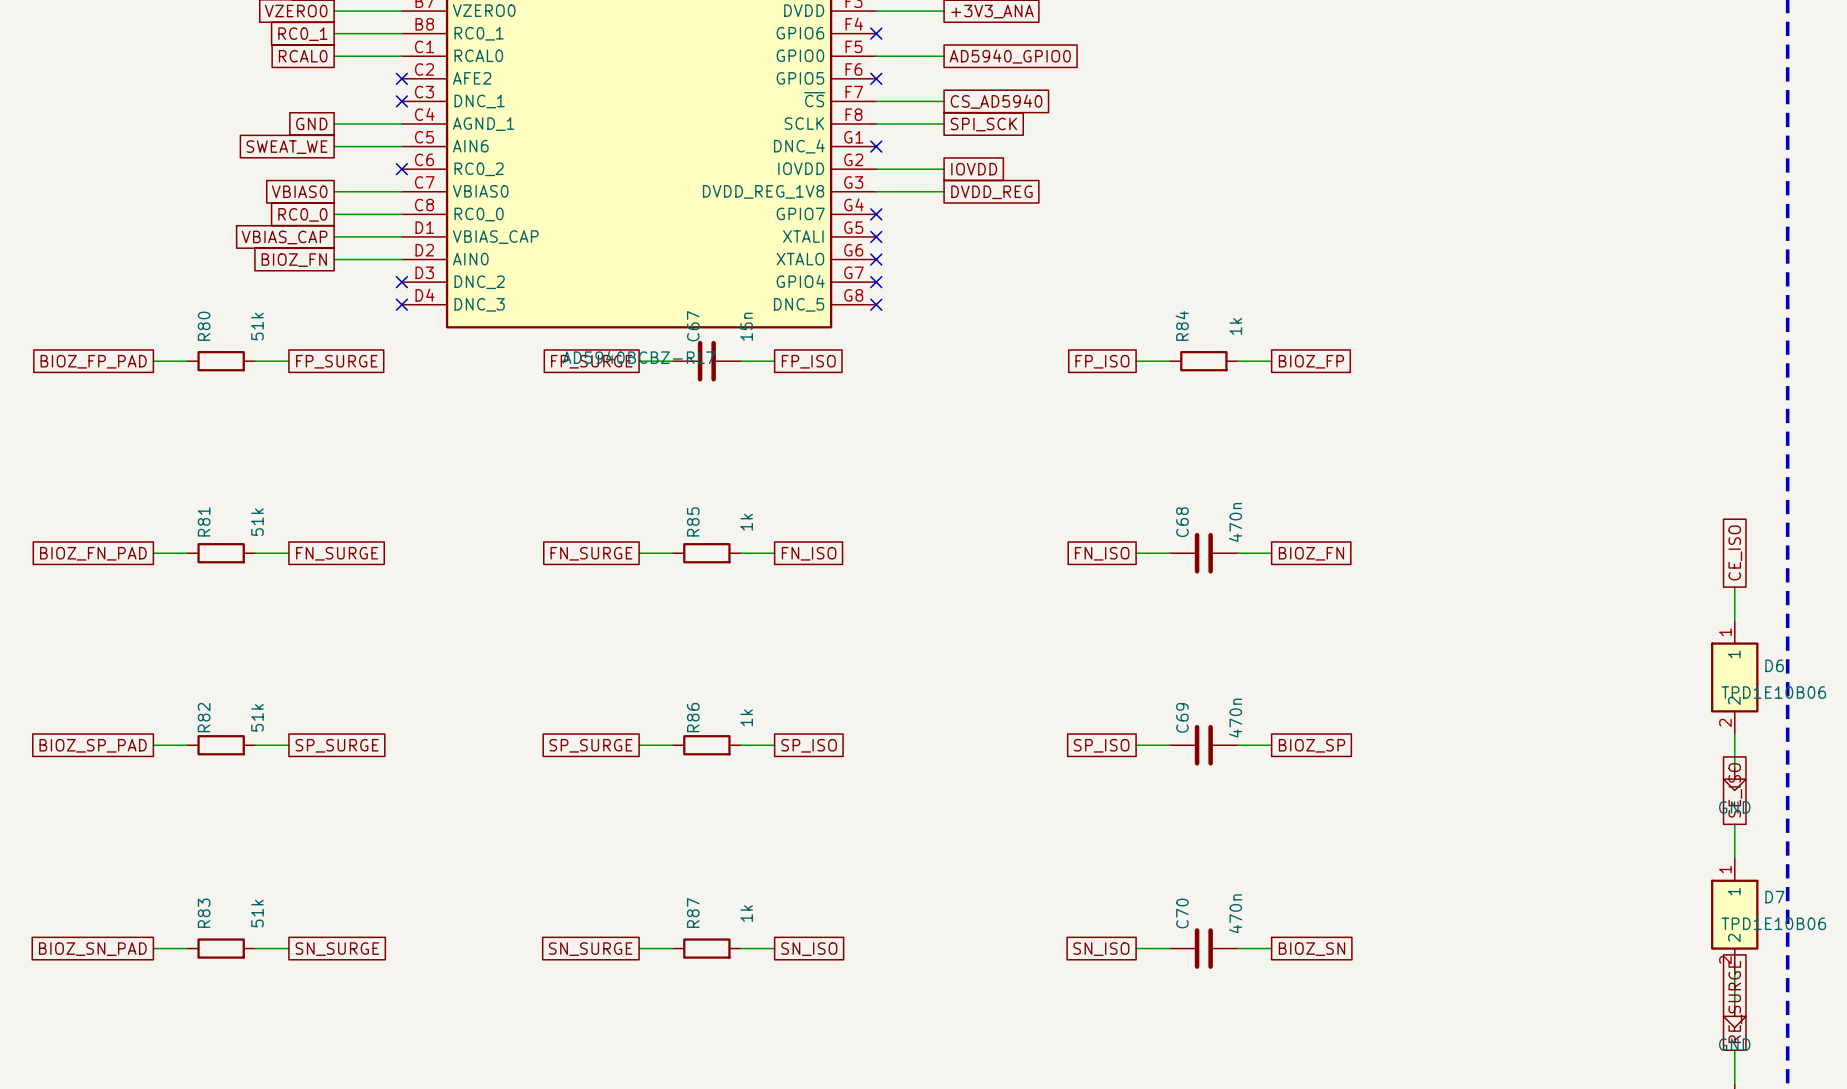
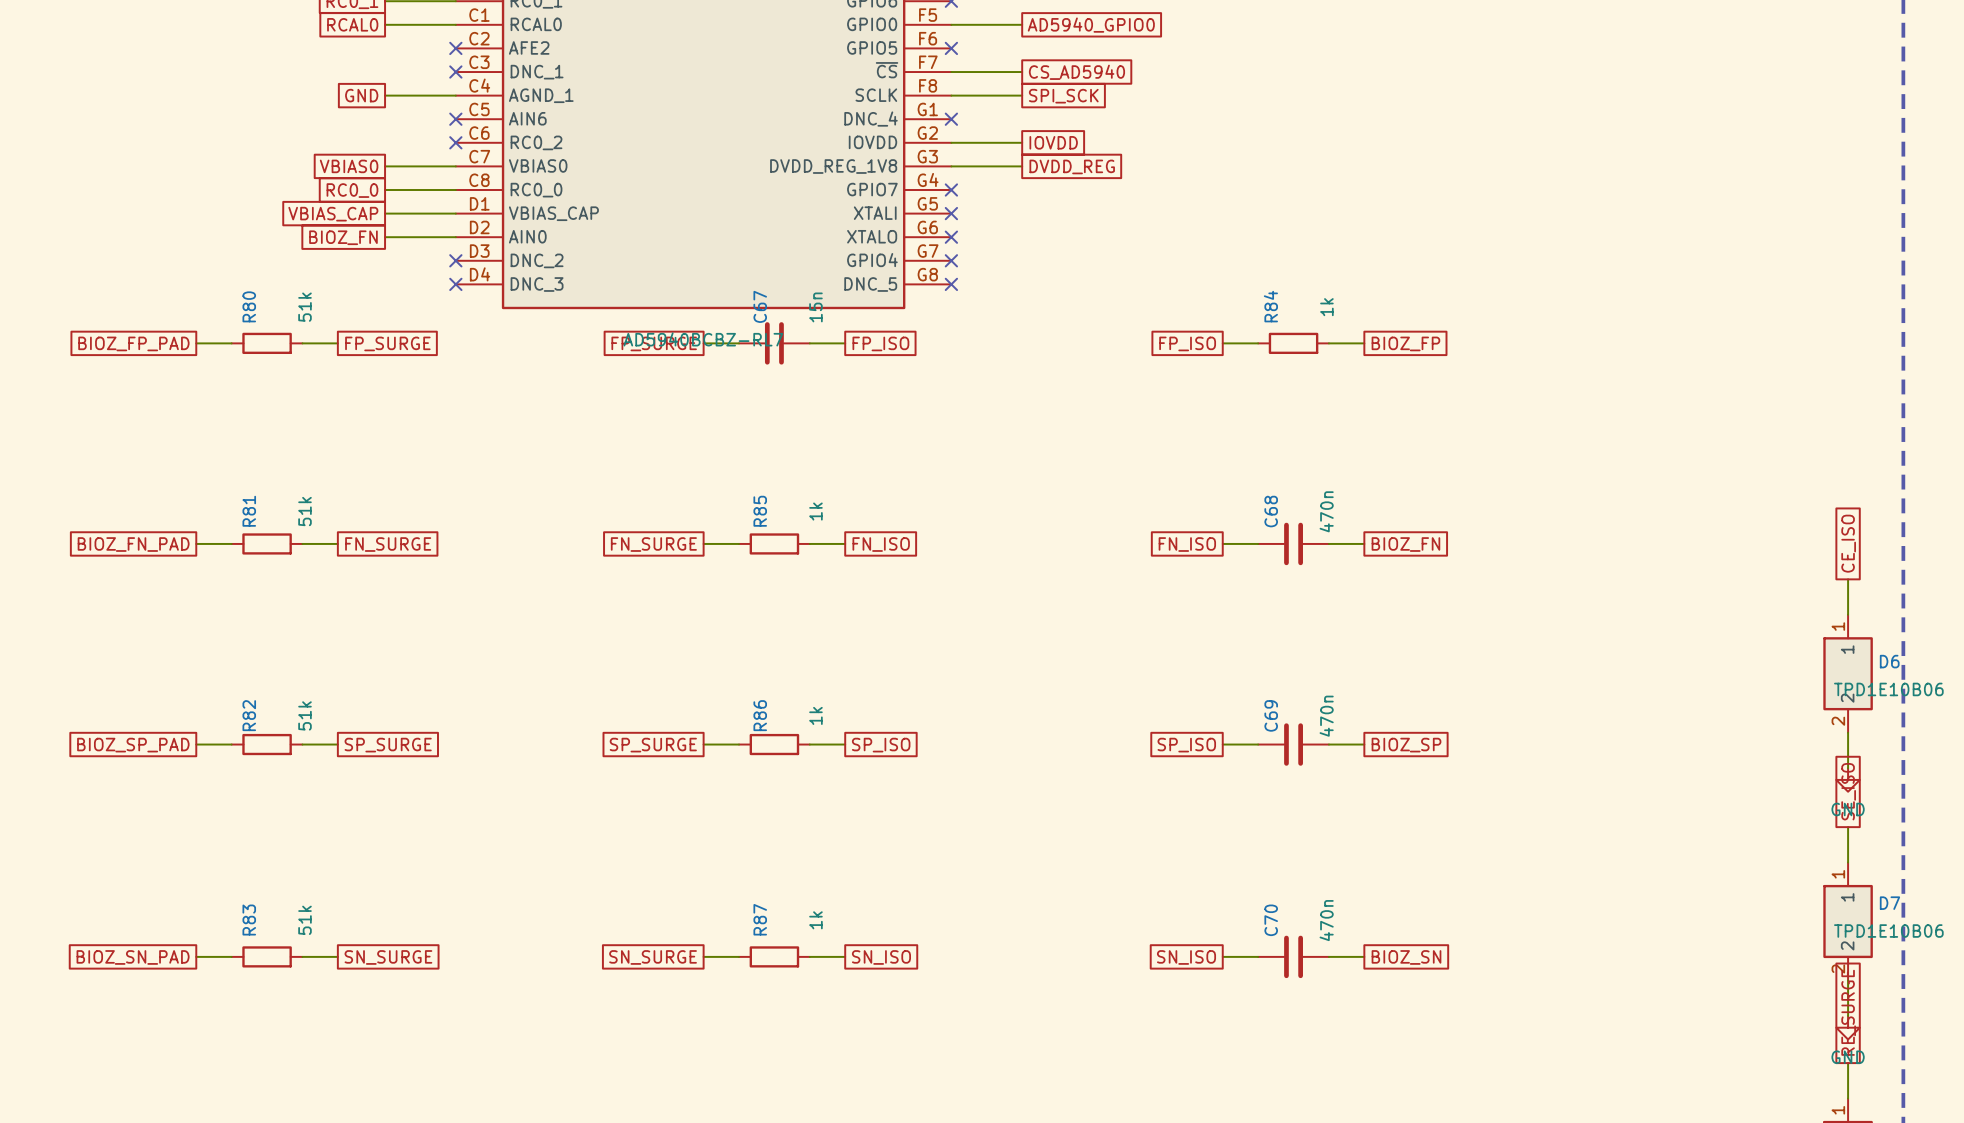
wire: (334, 146) (401, 146) -> none
no-connect mark: none -> (455, 119)
global label: SWEAT_WE (287, 147) -> none

